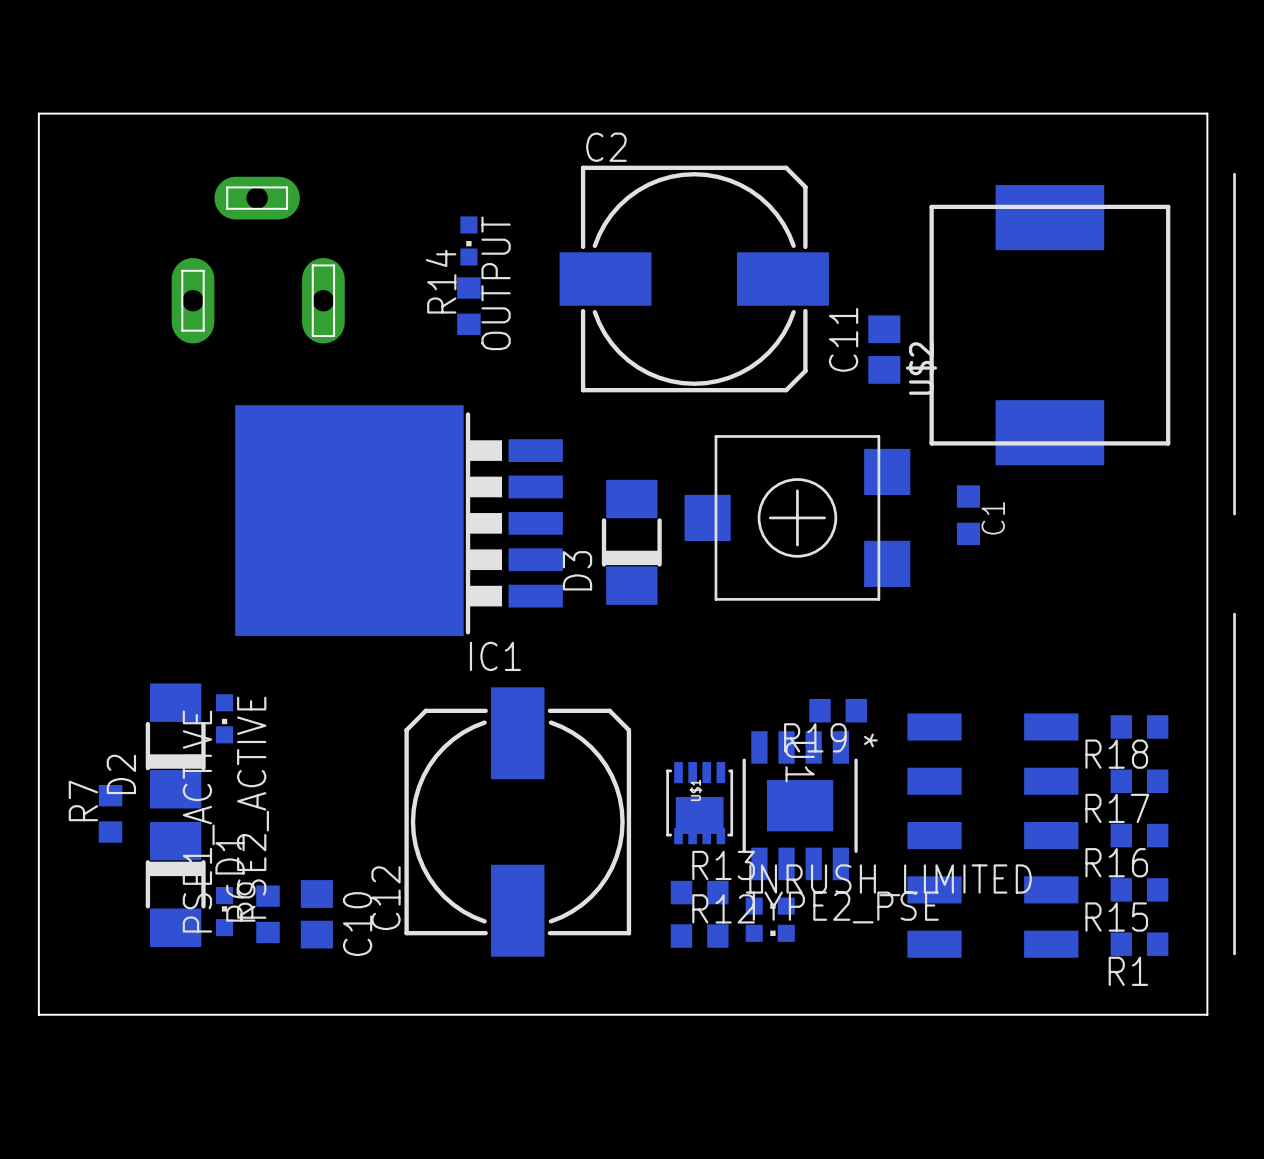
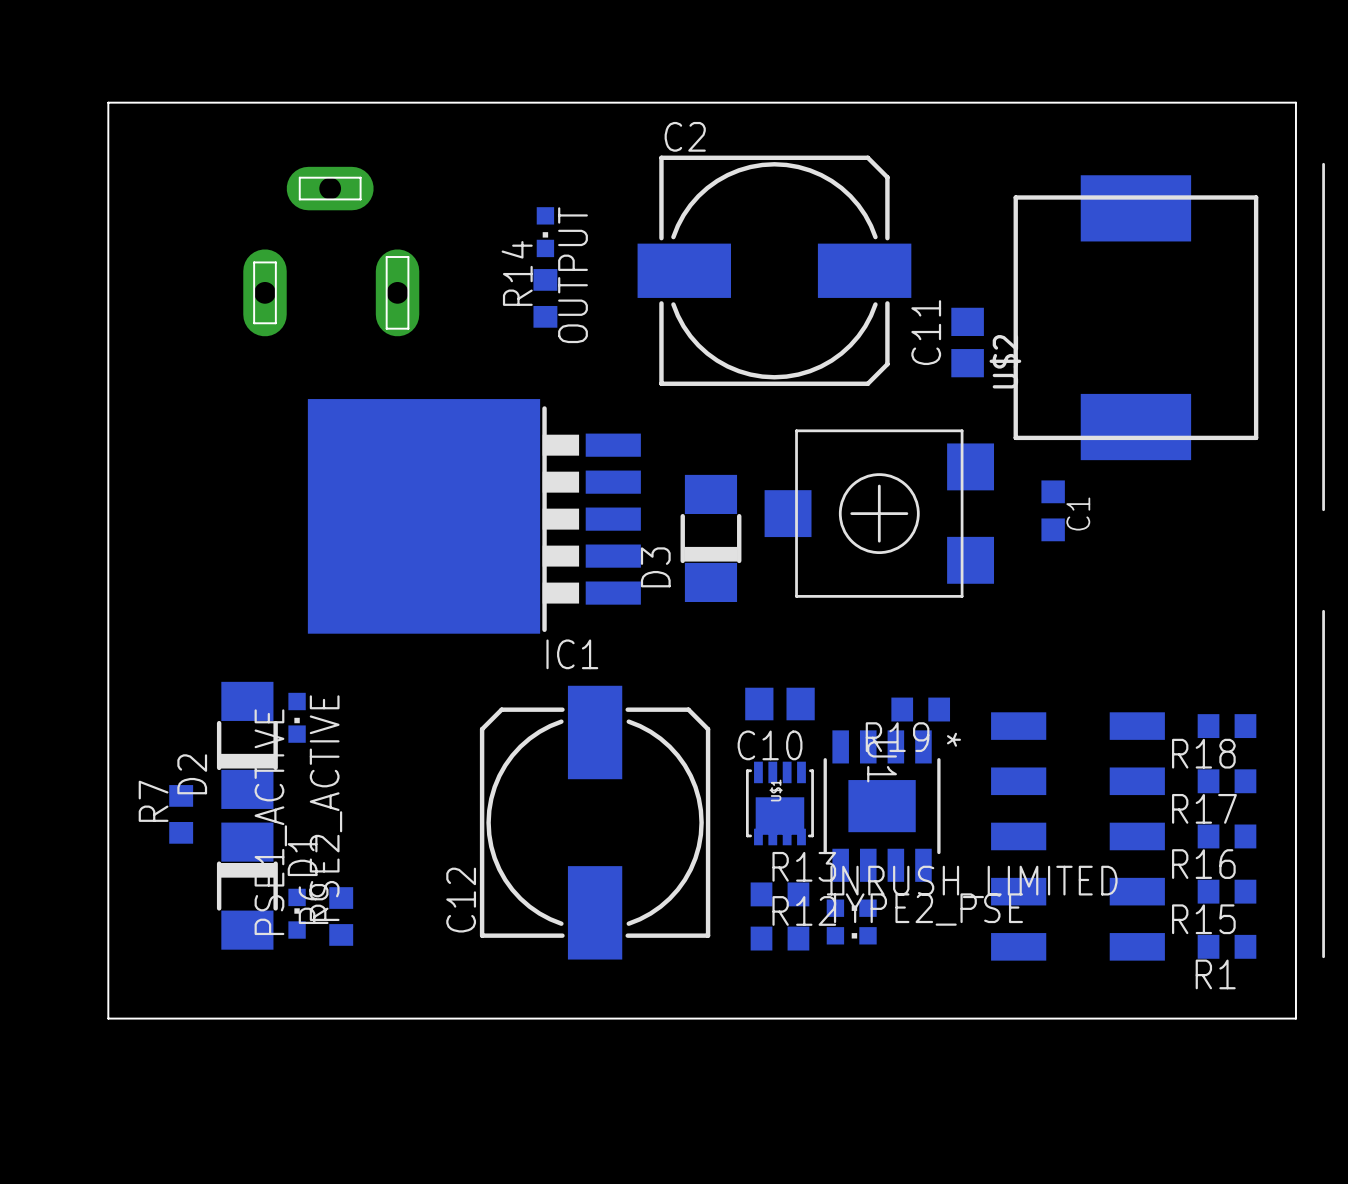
C10 rotation: 0° (316, 914) -> 90° clockwise (779, 704)
C10 position: (316, 914) -> (779, 704)

